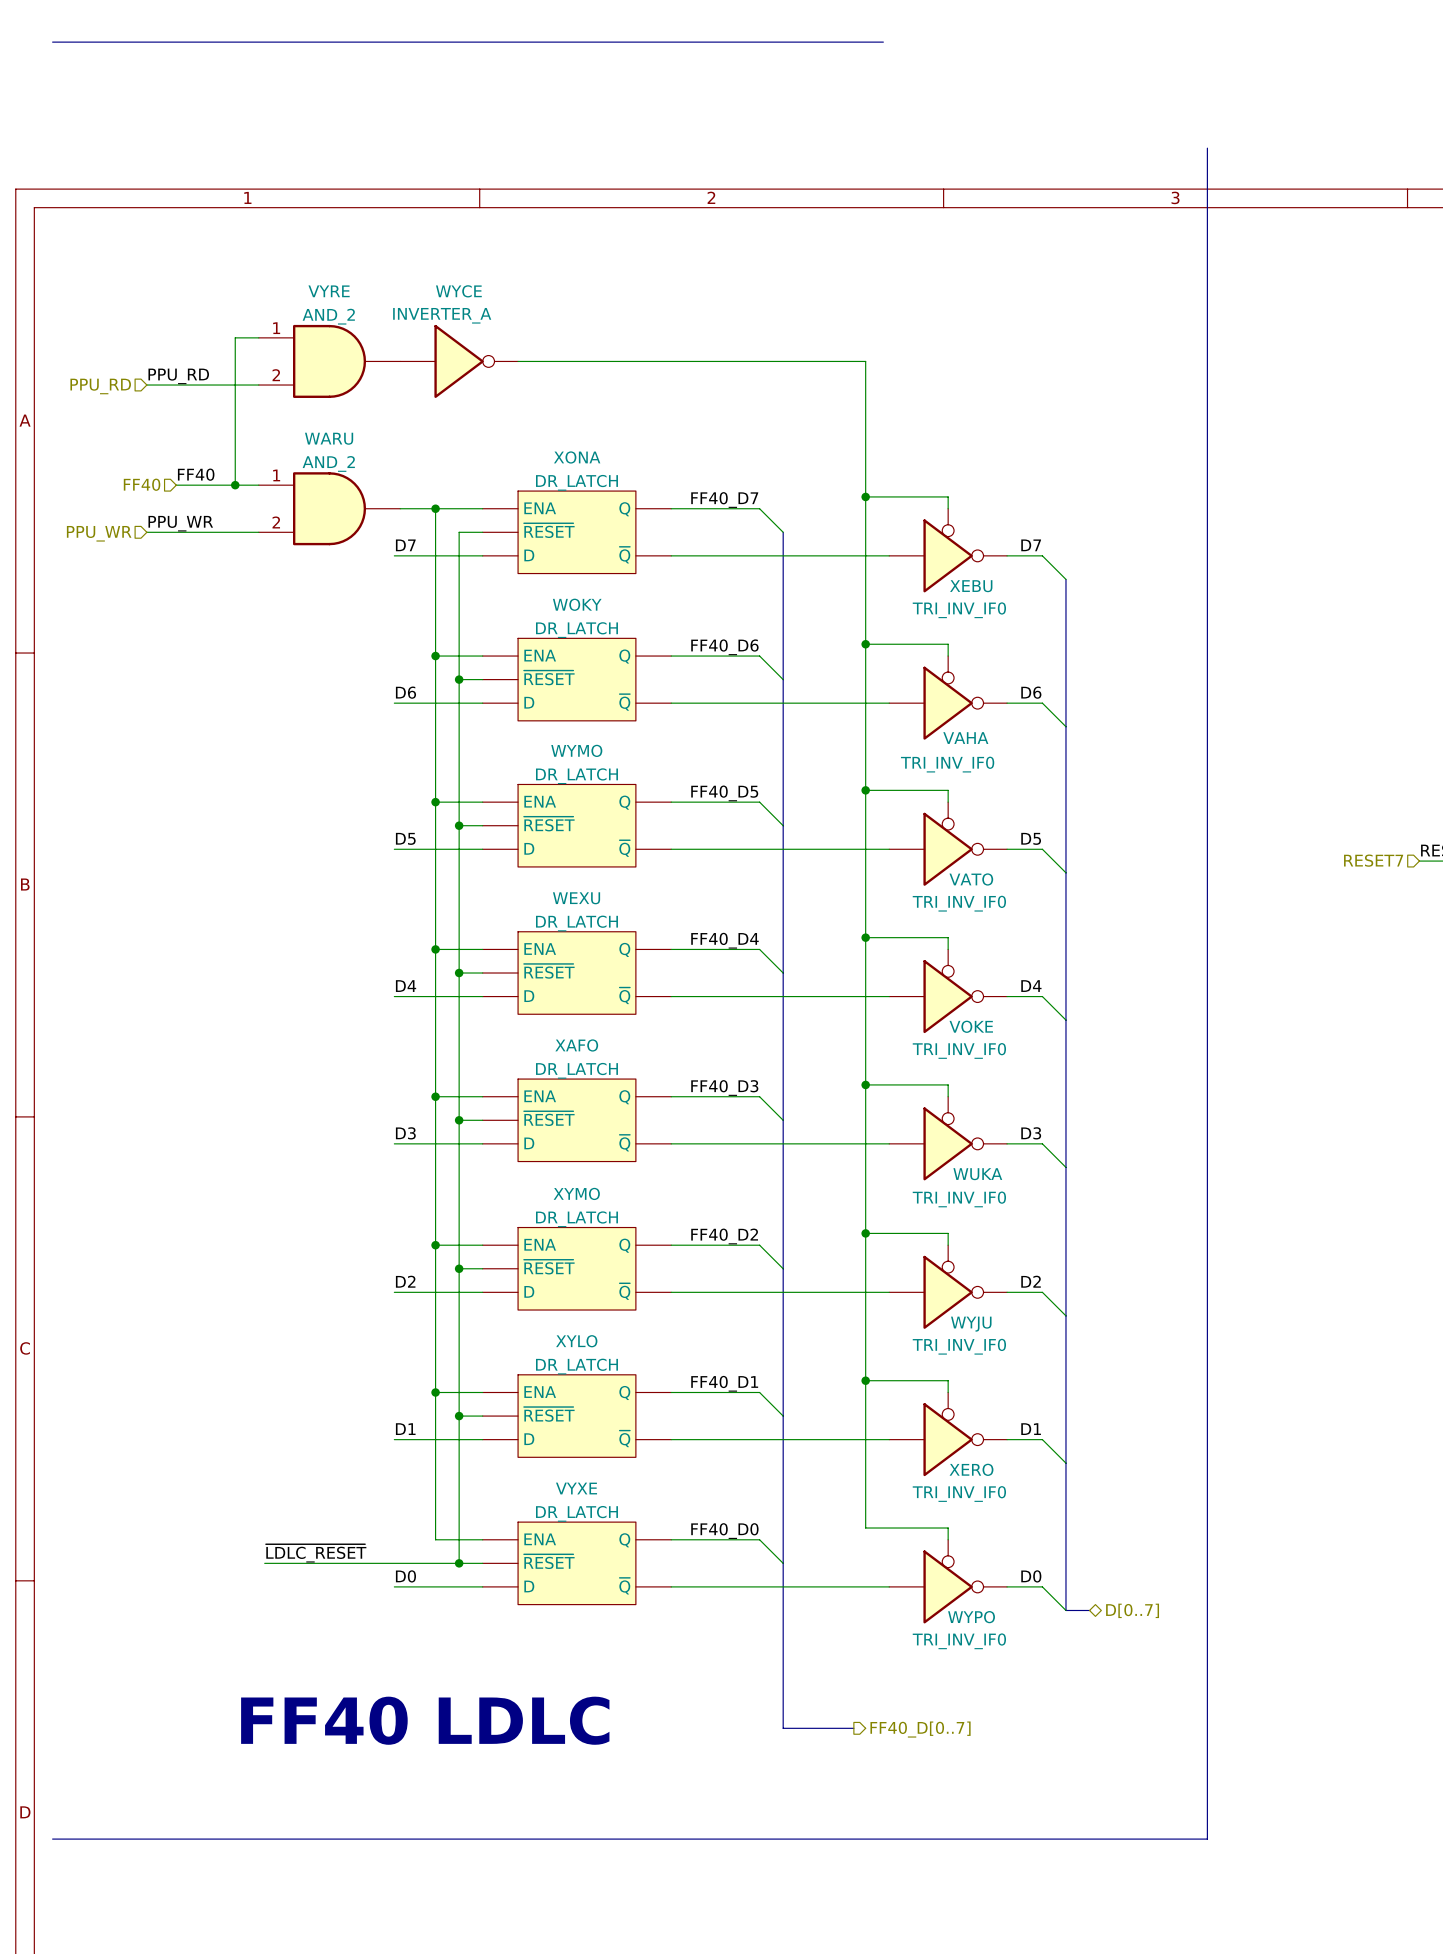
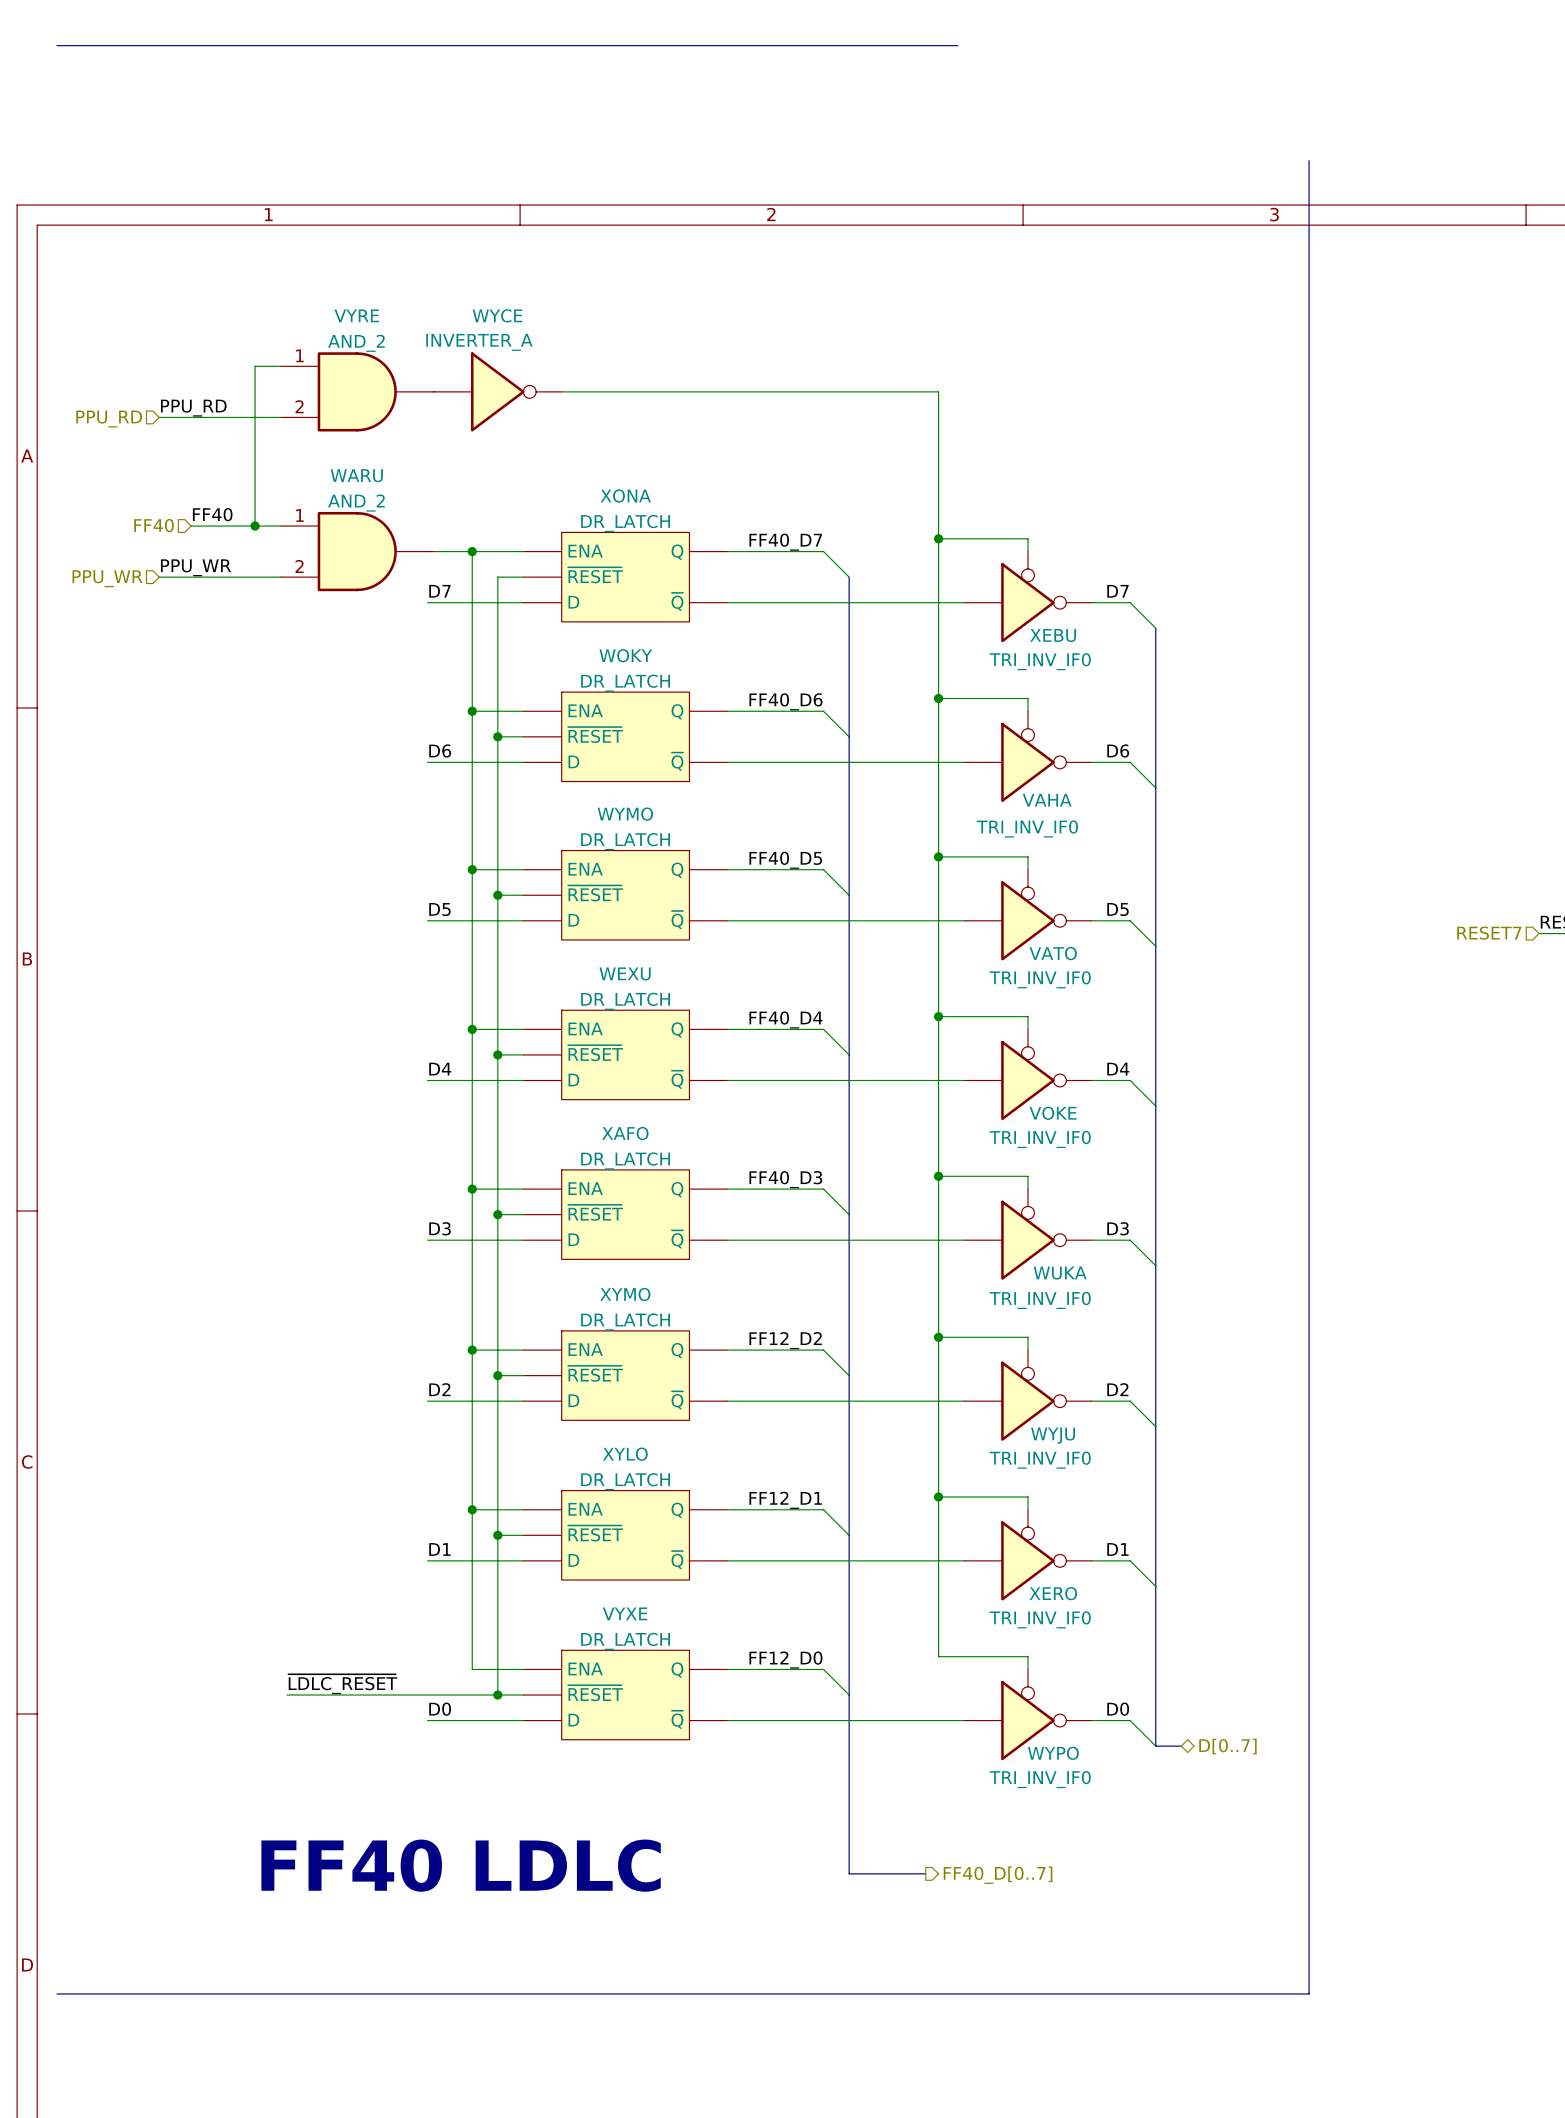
label: FF40_D2 (724, 1236) -> FF12_D2 (785, 1340)
label: FF40_D1 (724, 1383) -> FF12_D1 (785, 1500)
label: FF40_D0 (724, 1531) -> FF12_D0 (785, 1660)

